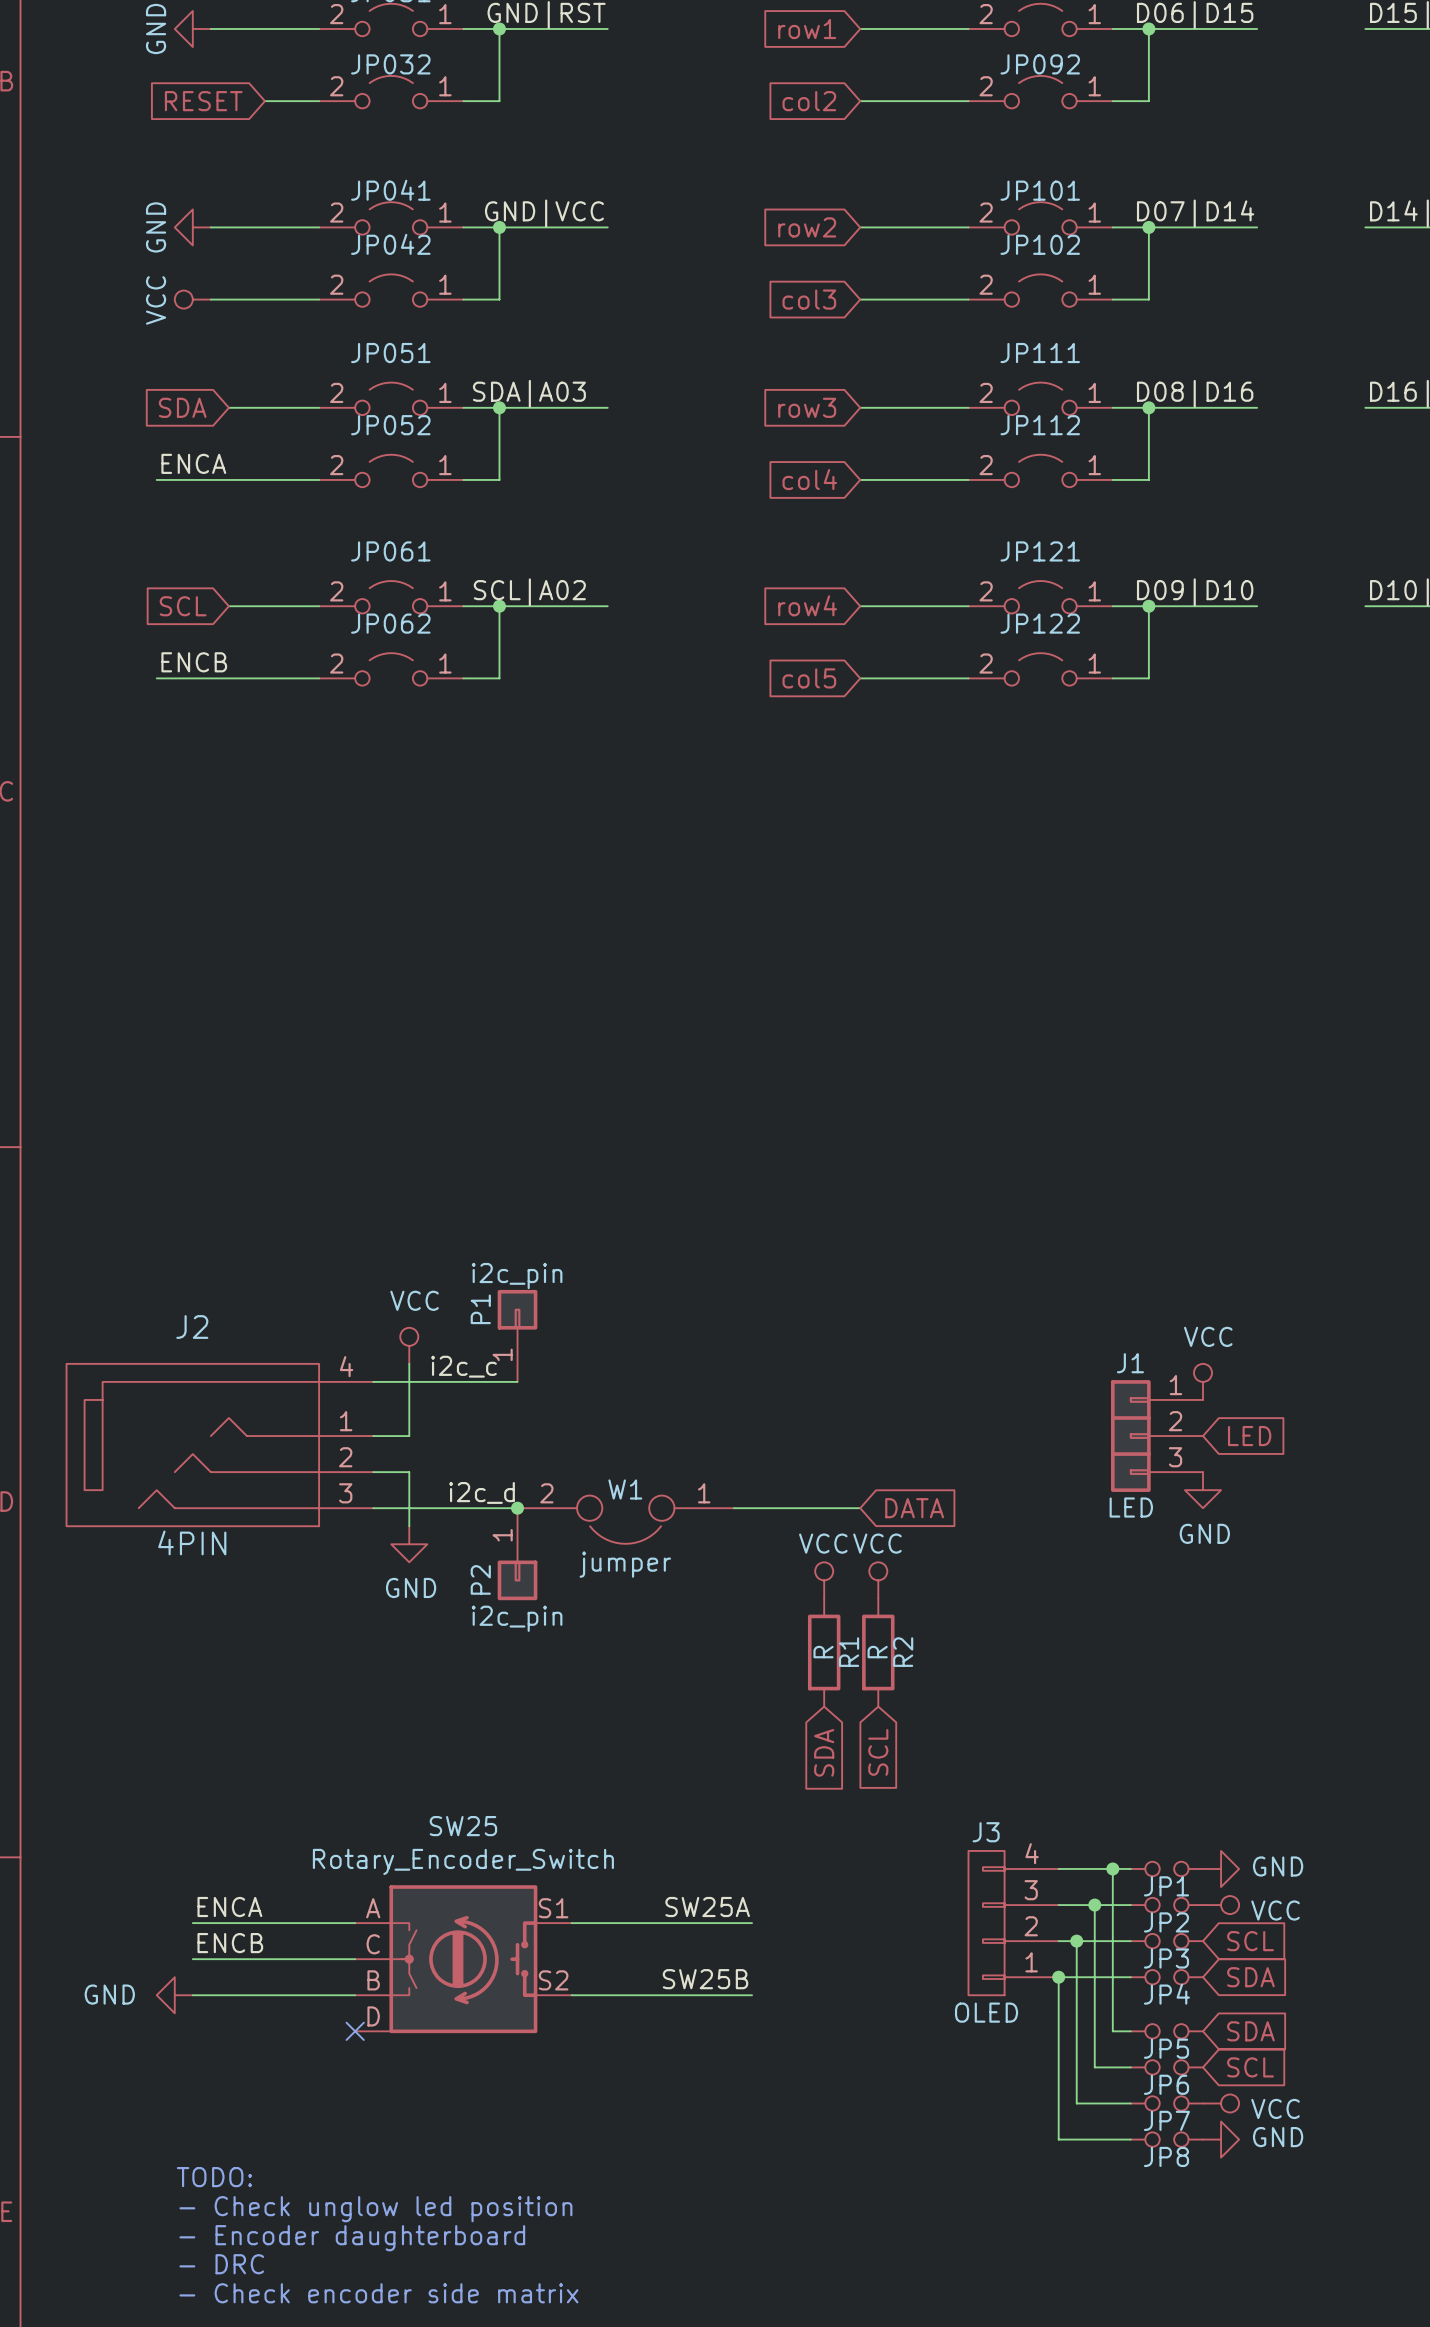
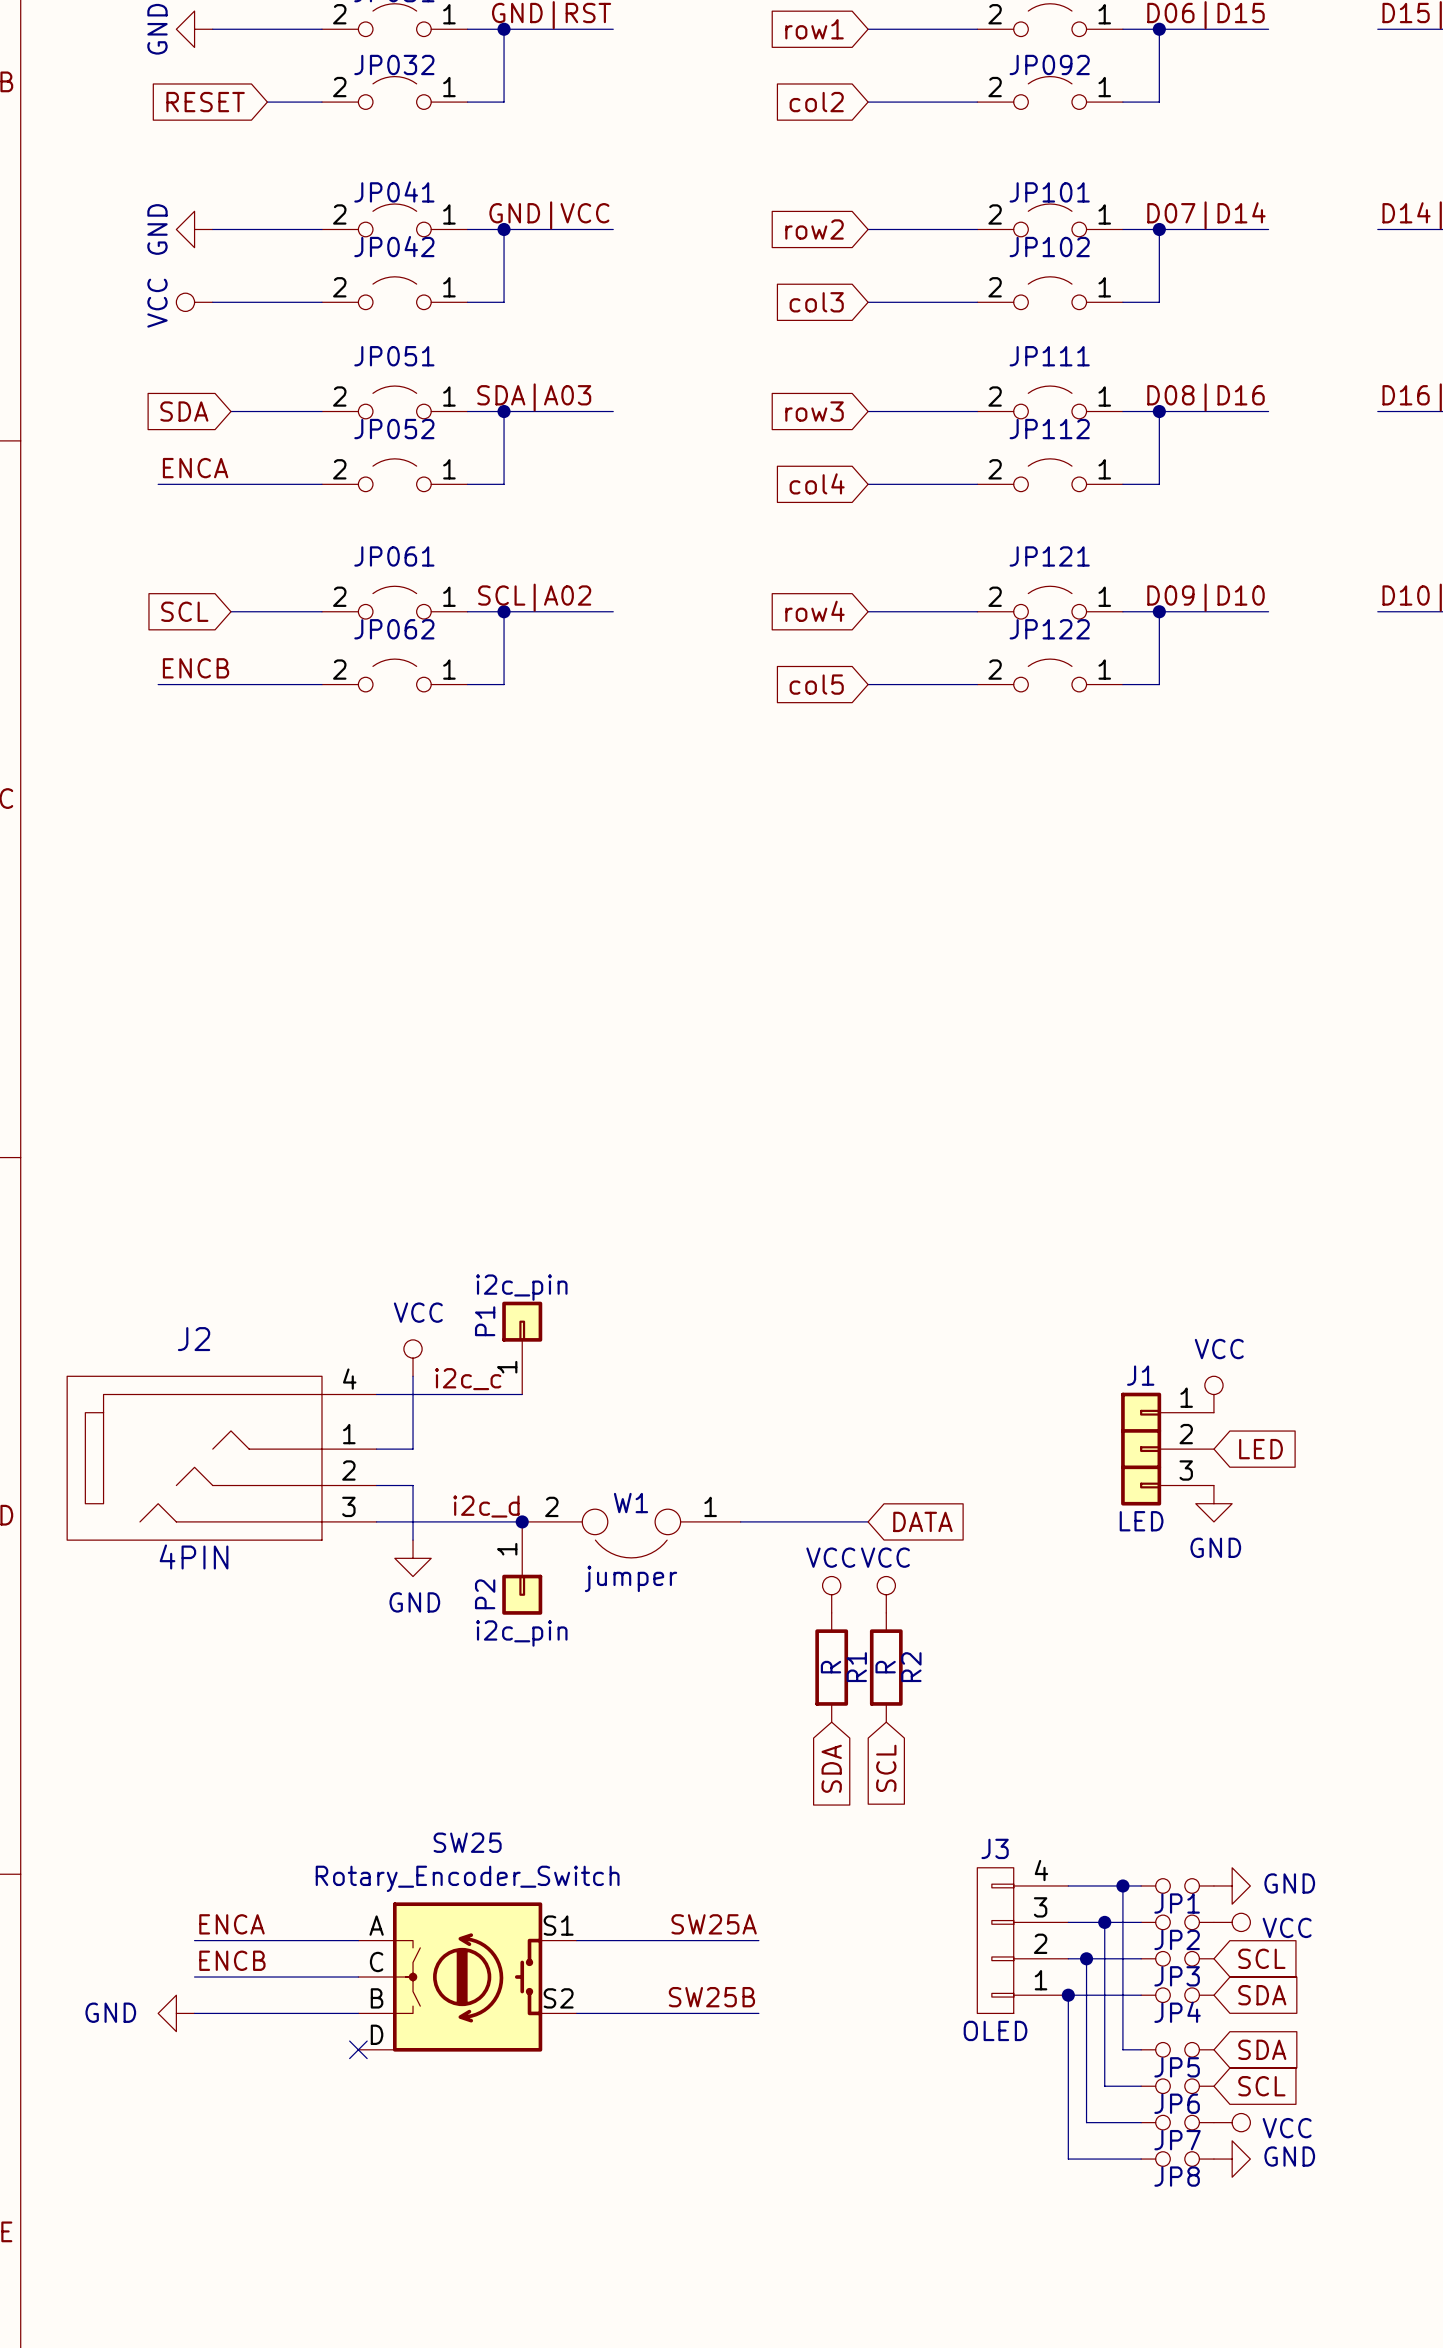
text: TODO: (214, 2177) -> none
text: - Check unglow led position (375, 2209) -> none
text: - Encoder daughterboard (352, 2238) -> none
text: - DRC (221, 2264) -> none
text: - Check encoder side matrix (378, 2293) -> none

